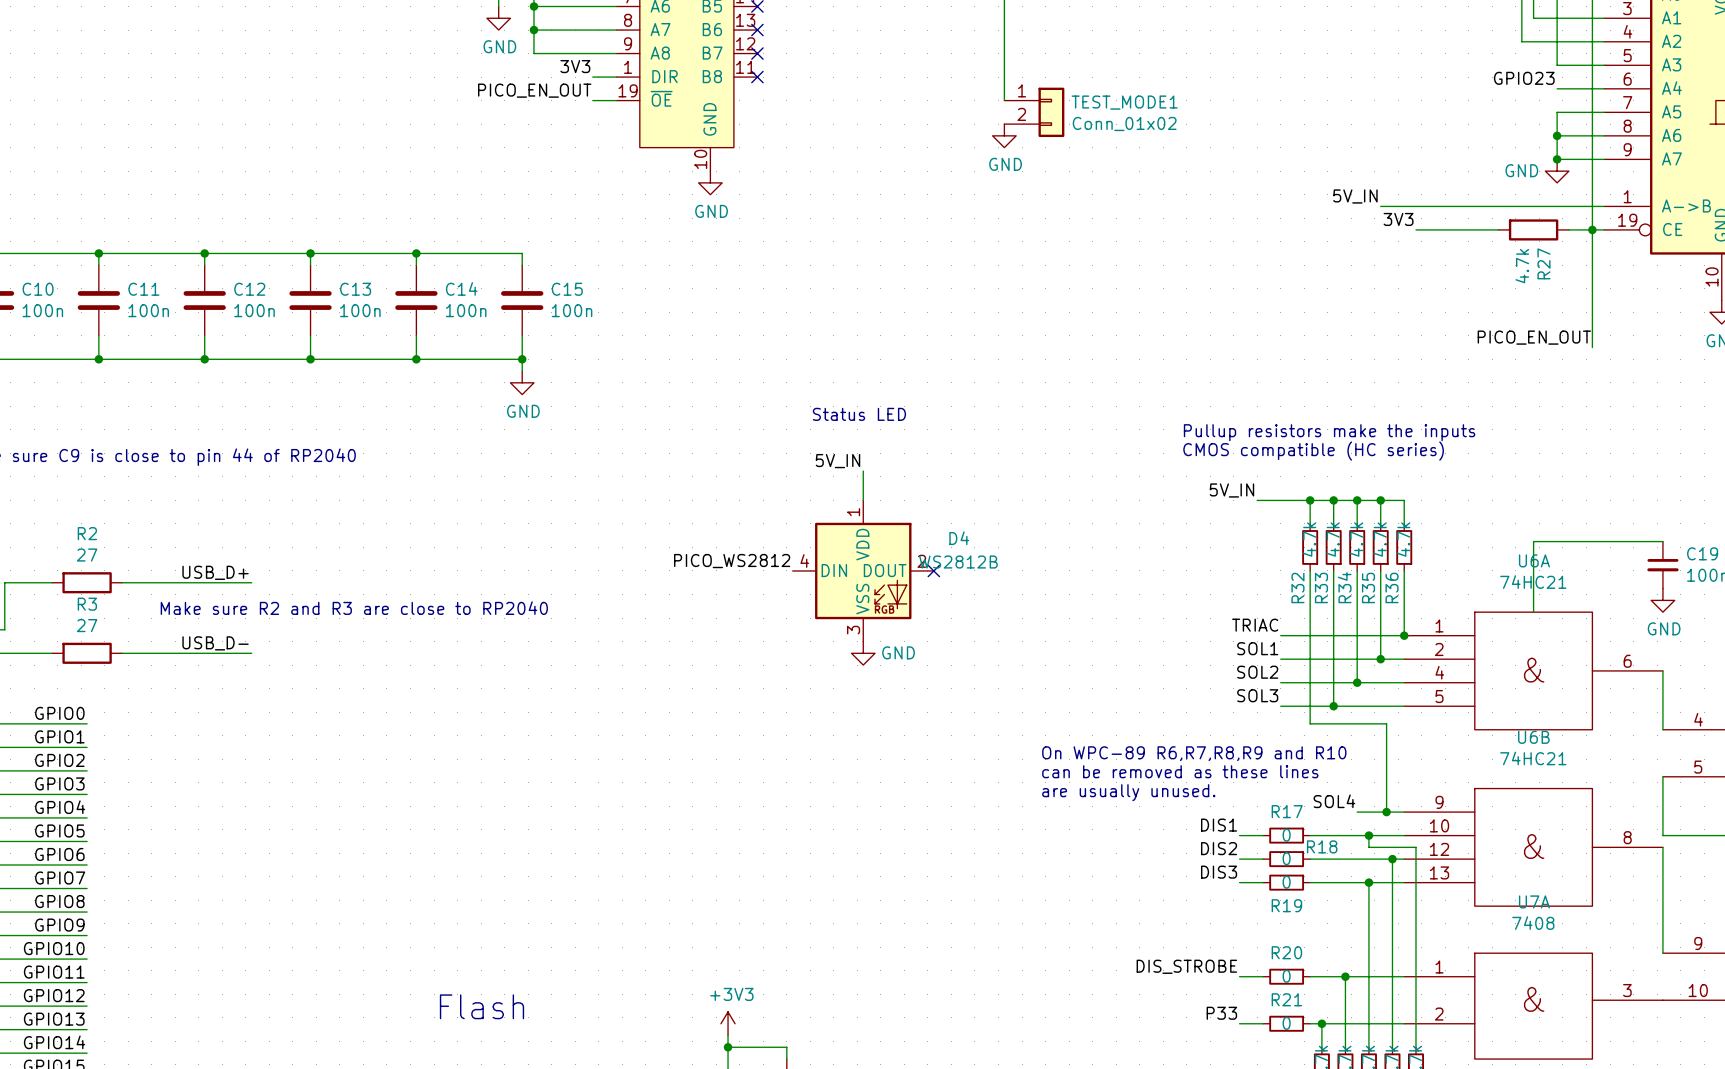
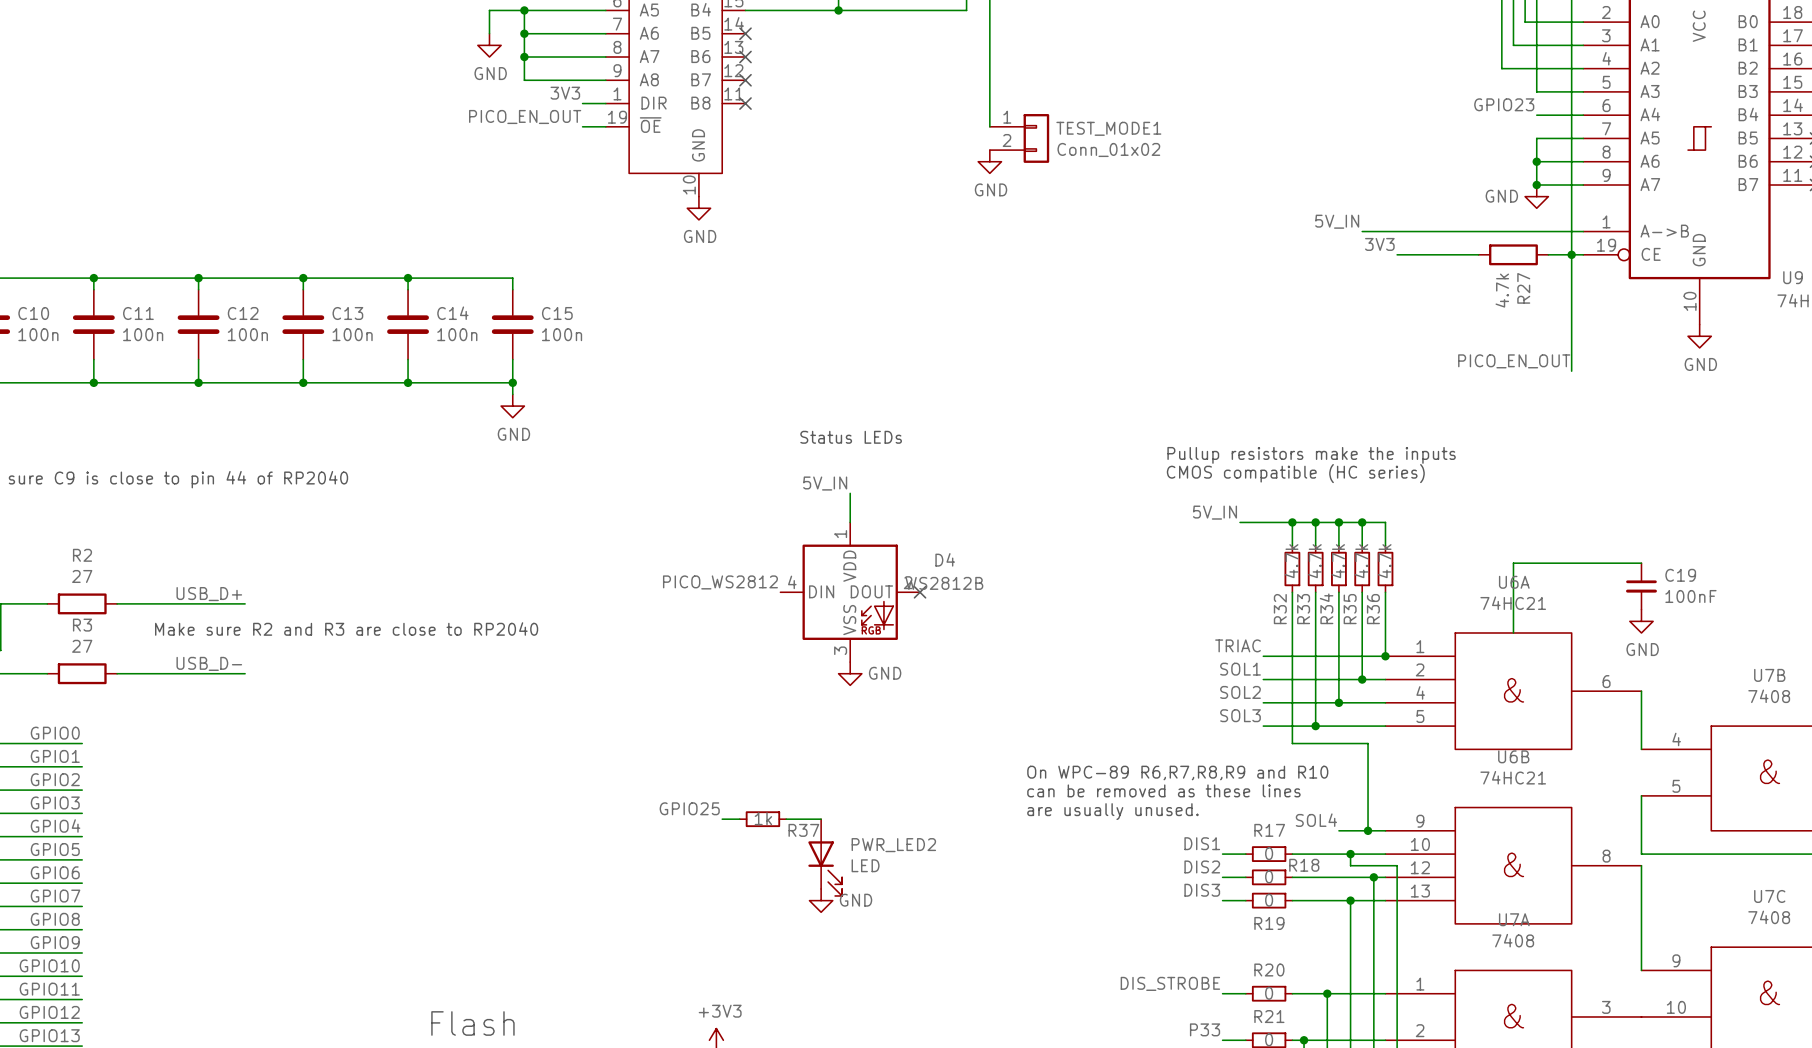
text: Status LED (859, 414) -> Status LEDs (851, 437)
label: none -> GPIO25 (689, 808)
wire: none -> (722, 819) (739, 819)
R37: none -> 1k (762, 819)
wire: none -> (786, 819) (821, 819)
PWR_LED2: none -> LED (825, 857)
power symbol: none -> GND (821, 900)

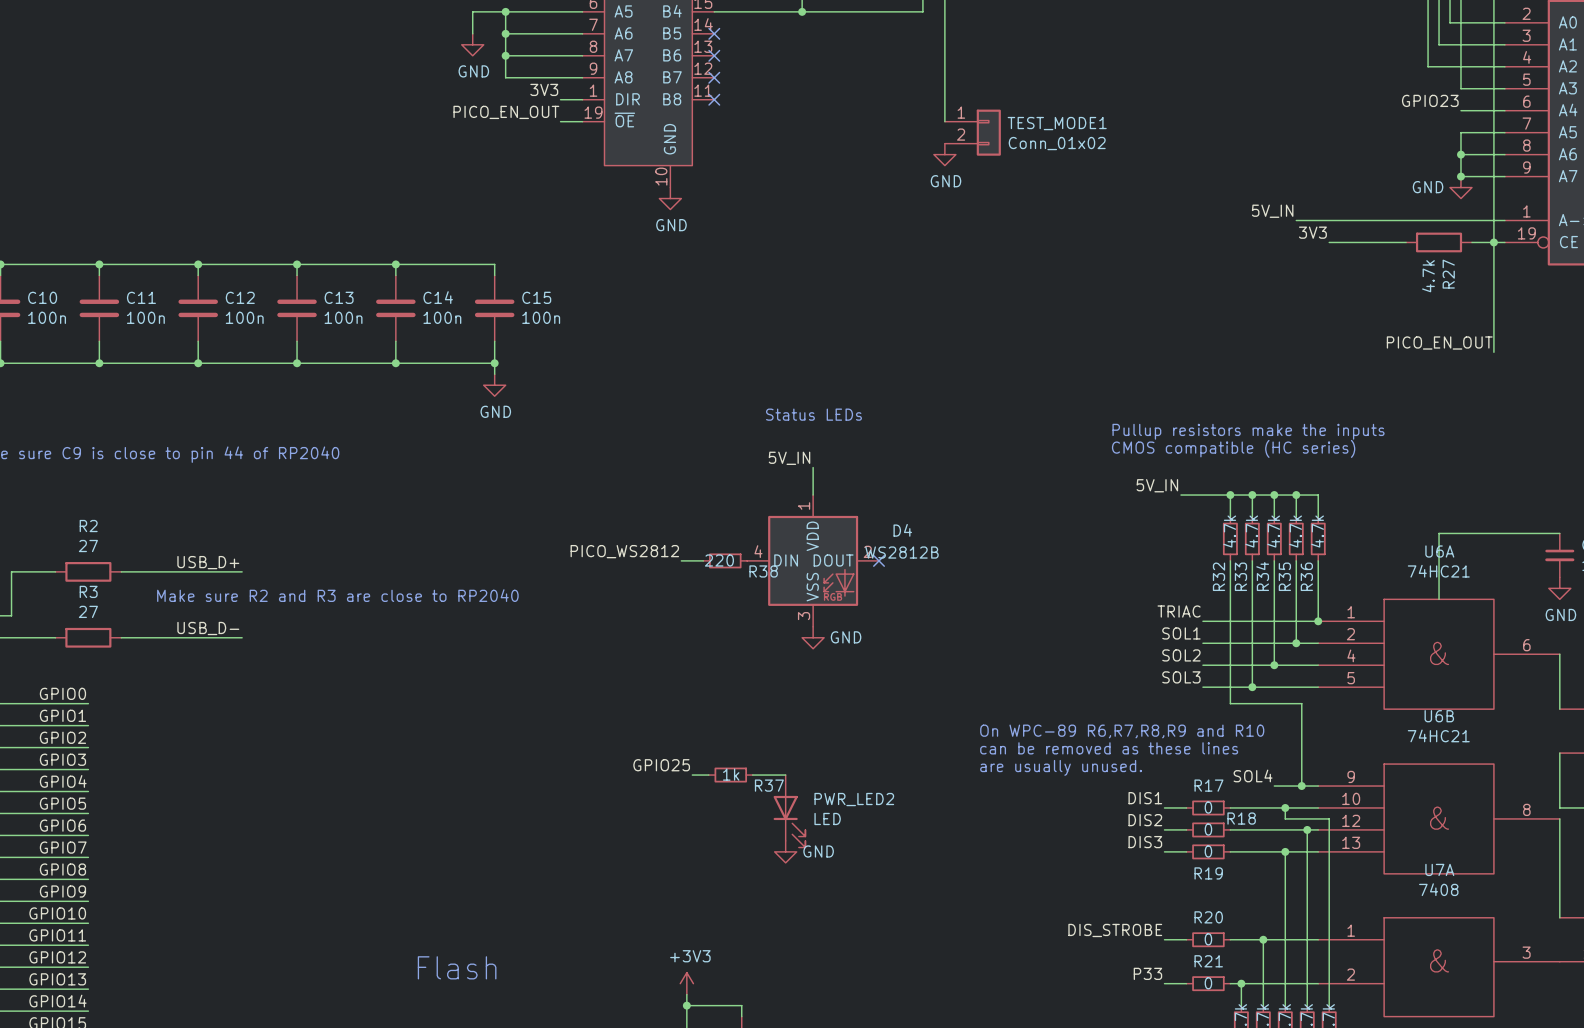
label position: PICO_WS2812 (720, 582) -> PICO_WS2812 (624, 551)
wire: none -> (681, 560) (703, 560)
R38: none -> 220 (725, 560)

